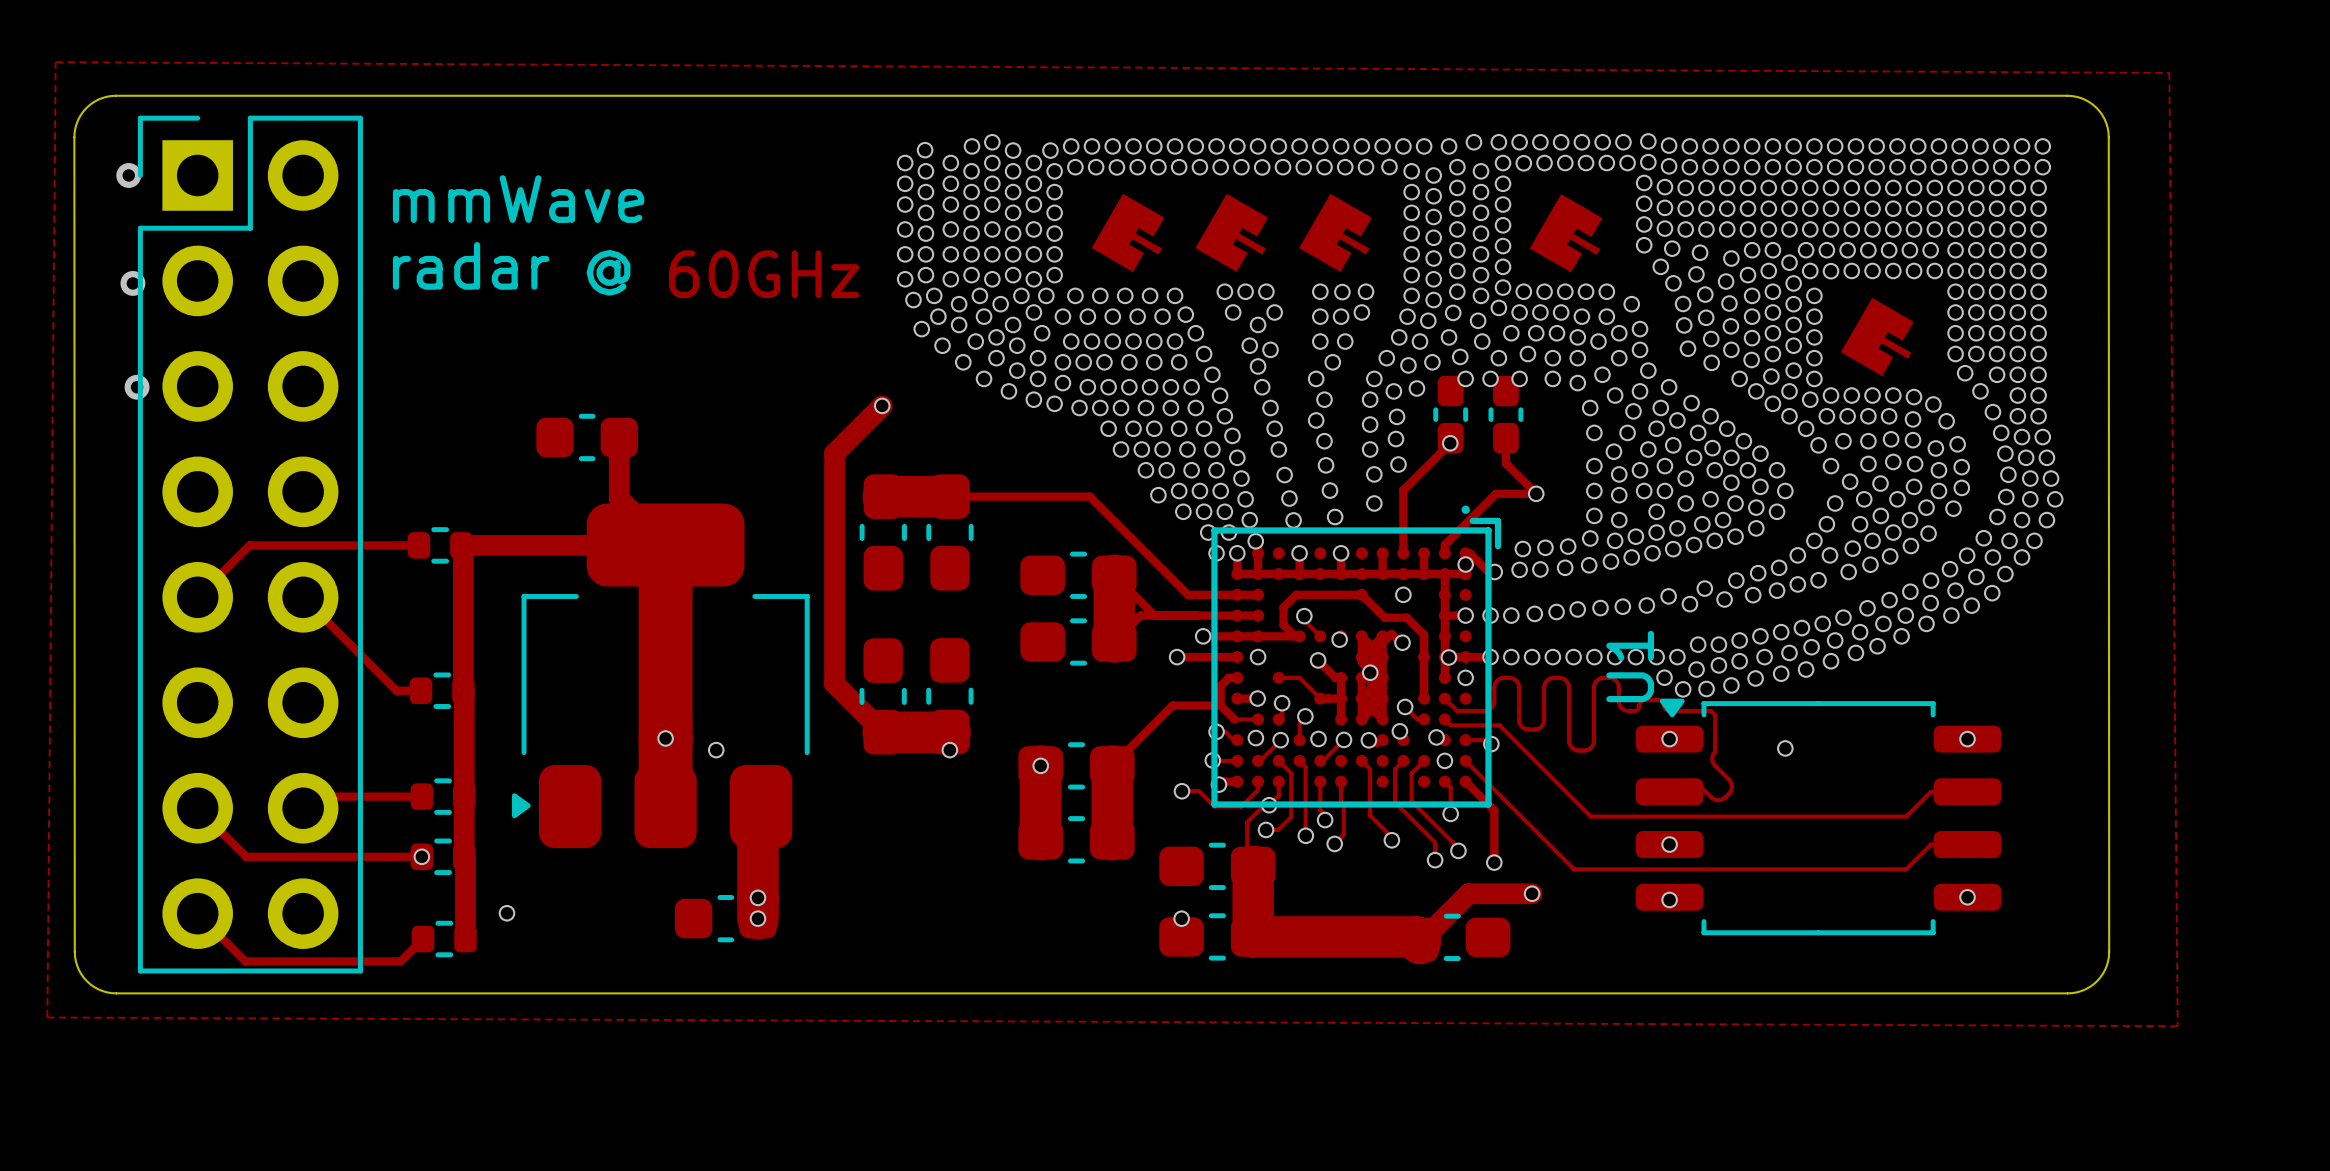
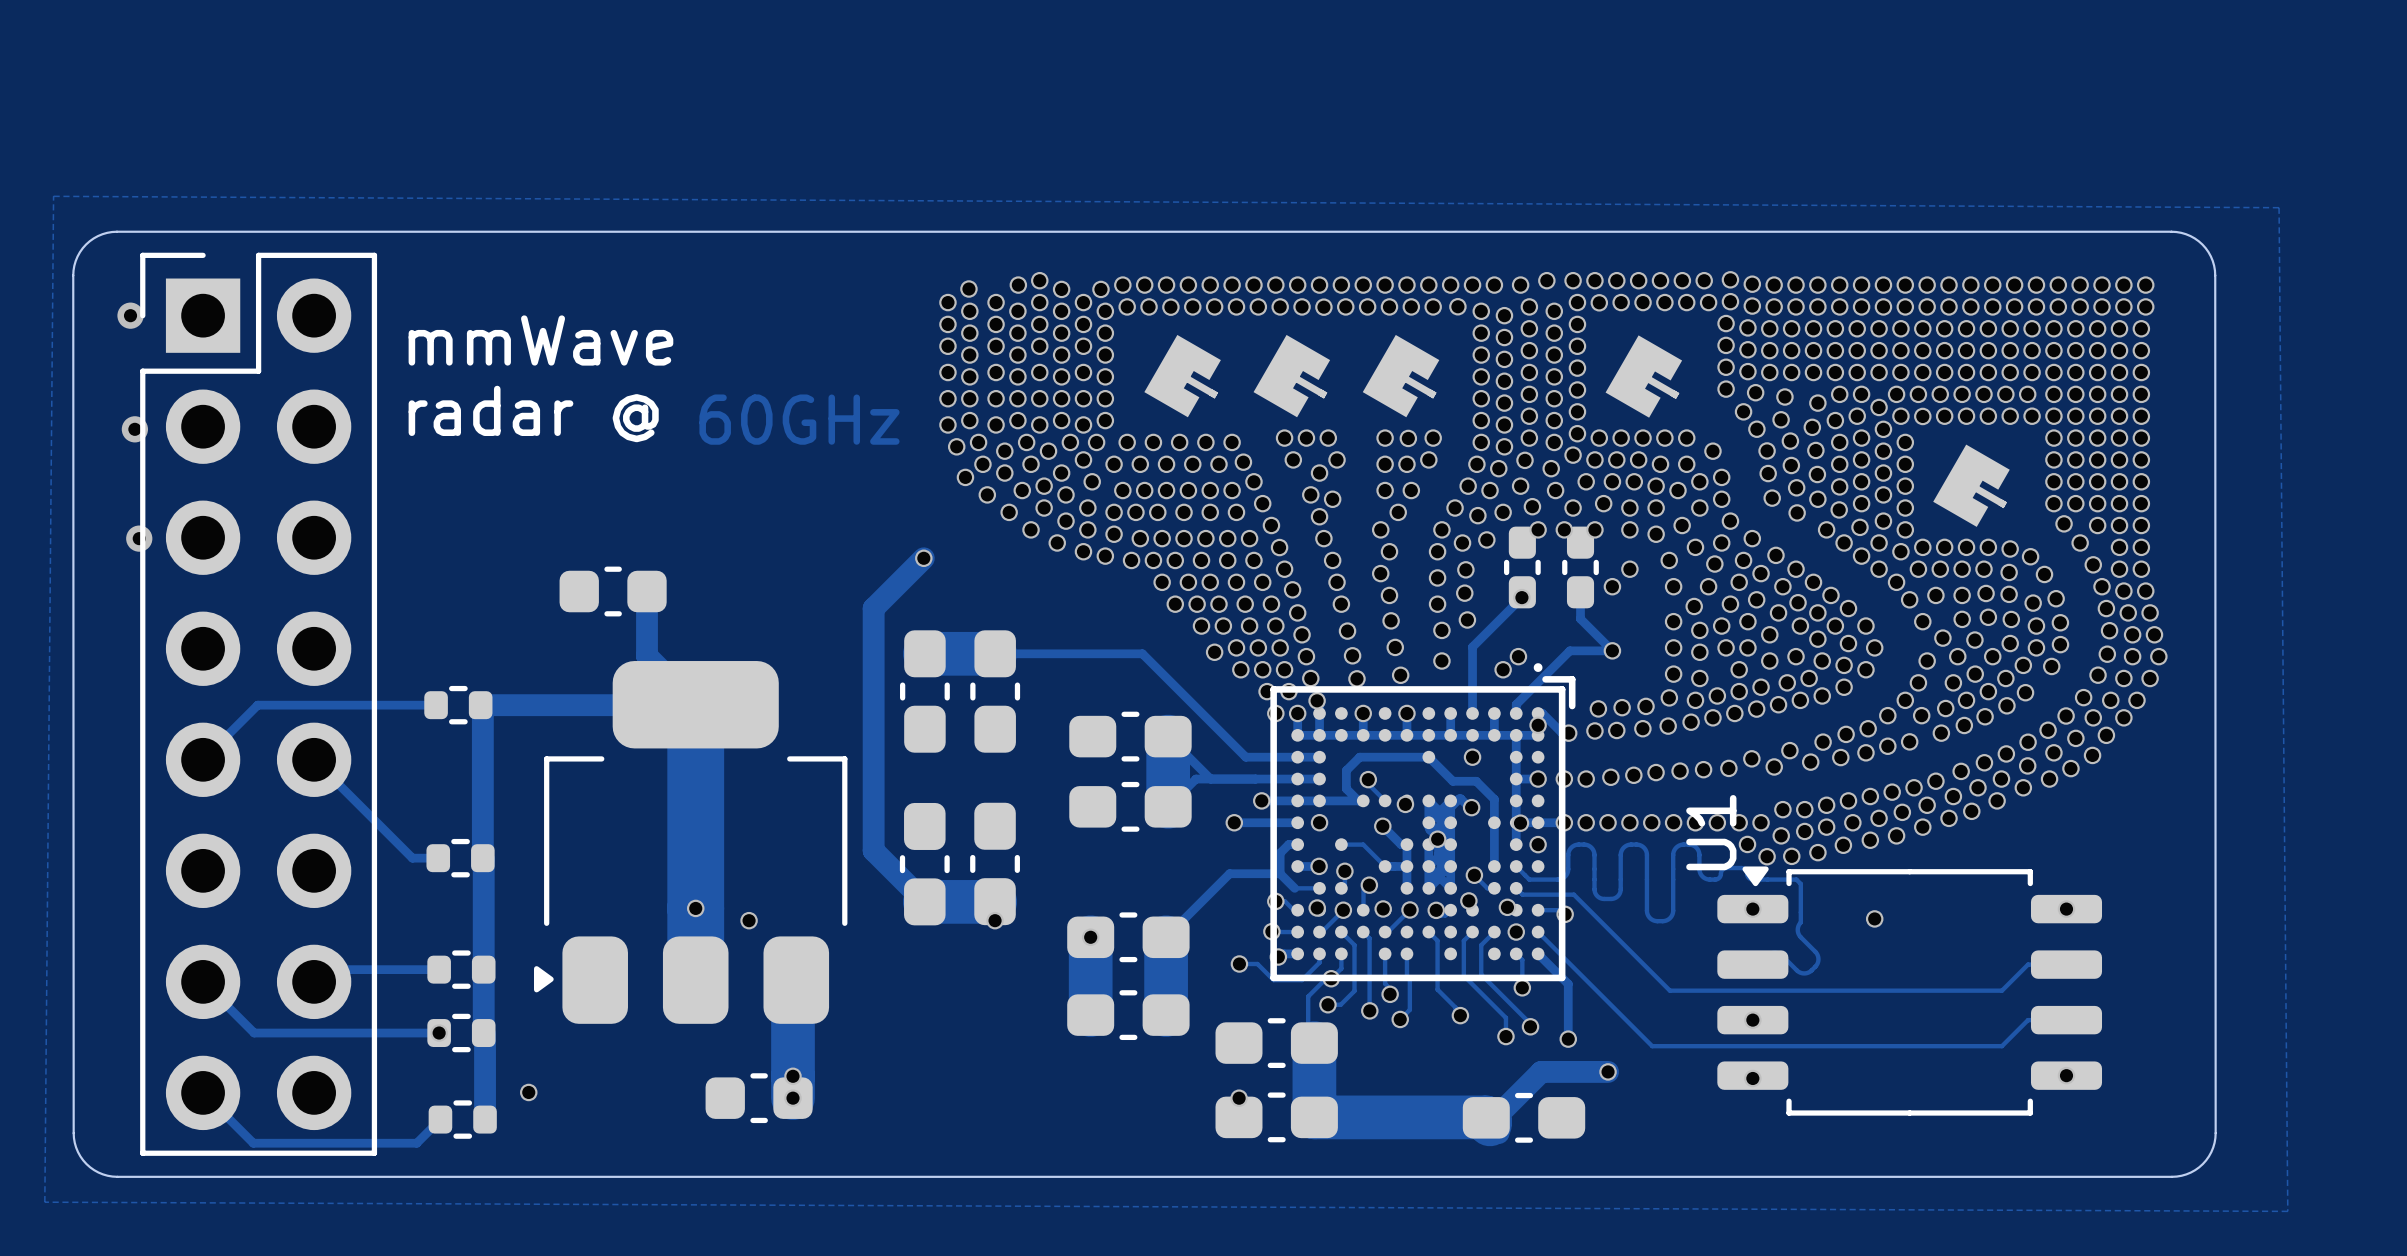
via: none -> (1629, 569)
via: none -> (1612, 586)
via: none -> (1518, 656)
via: none -> (1503, 669)

